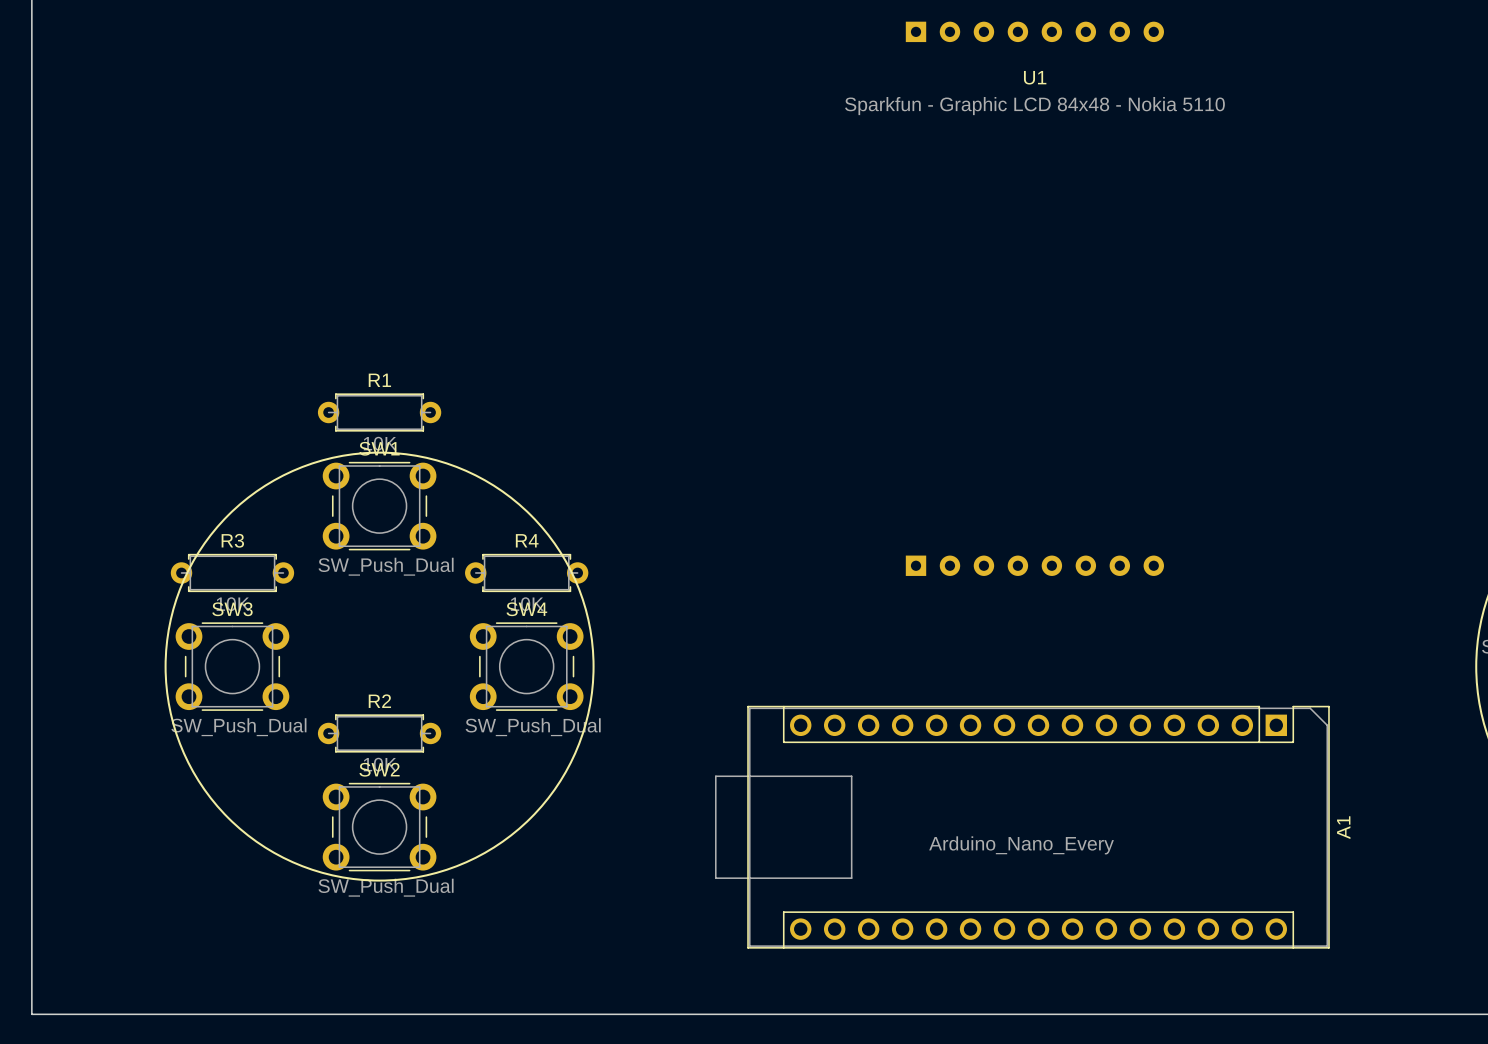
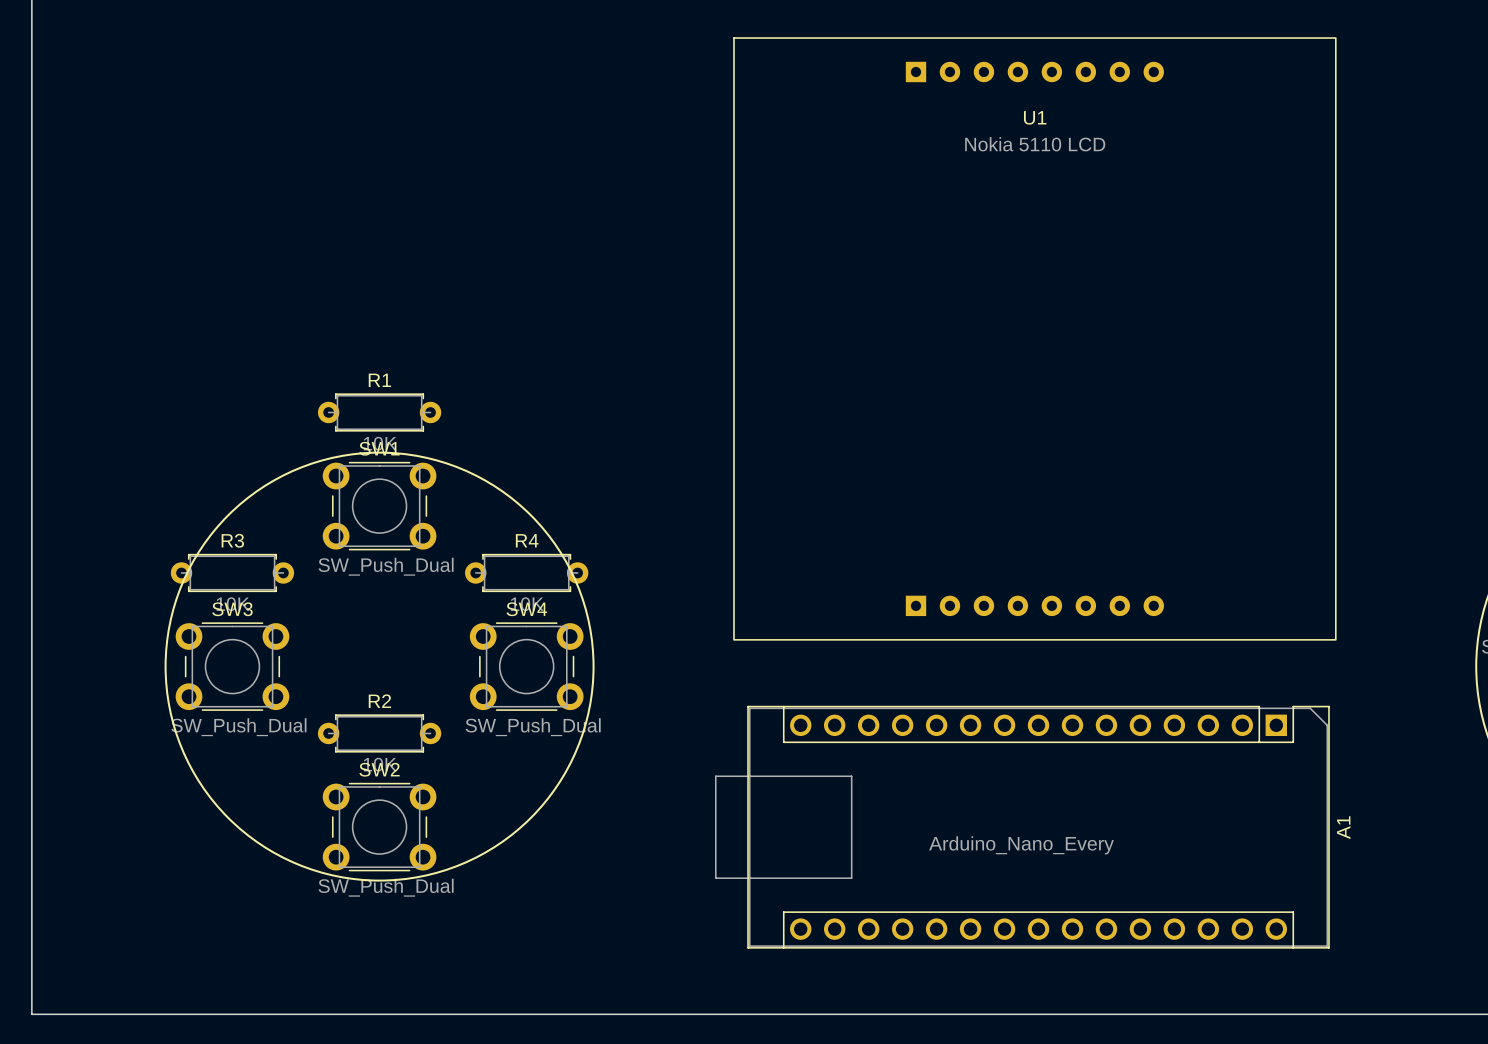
U1 footprint: [905, 21, 1164, 576] -> [733, 37, 1337, 641]
U1 value: Sparkfun - Graphic LCD 84x48 - Nokia 5110 (1034, 106) -> Nokia 5110 LCD (1035, 144)

